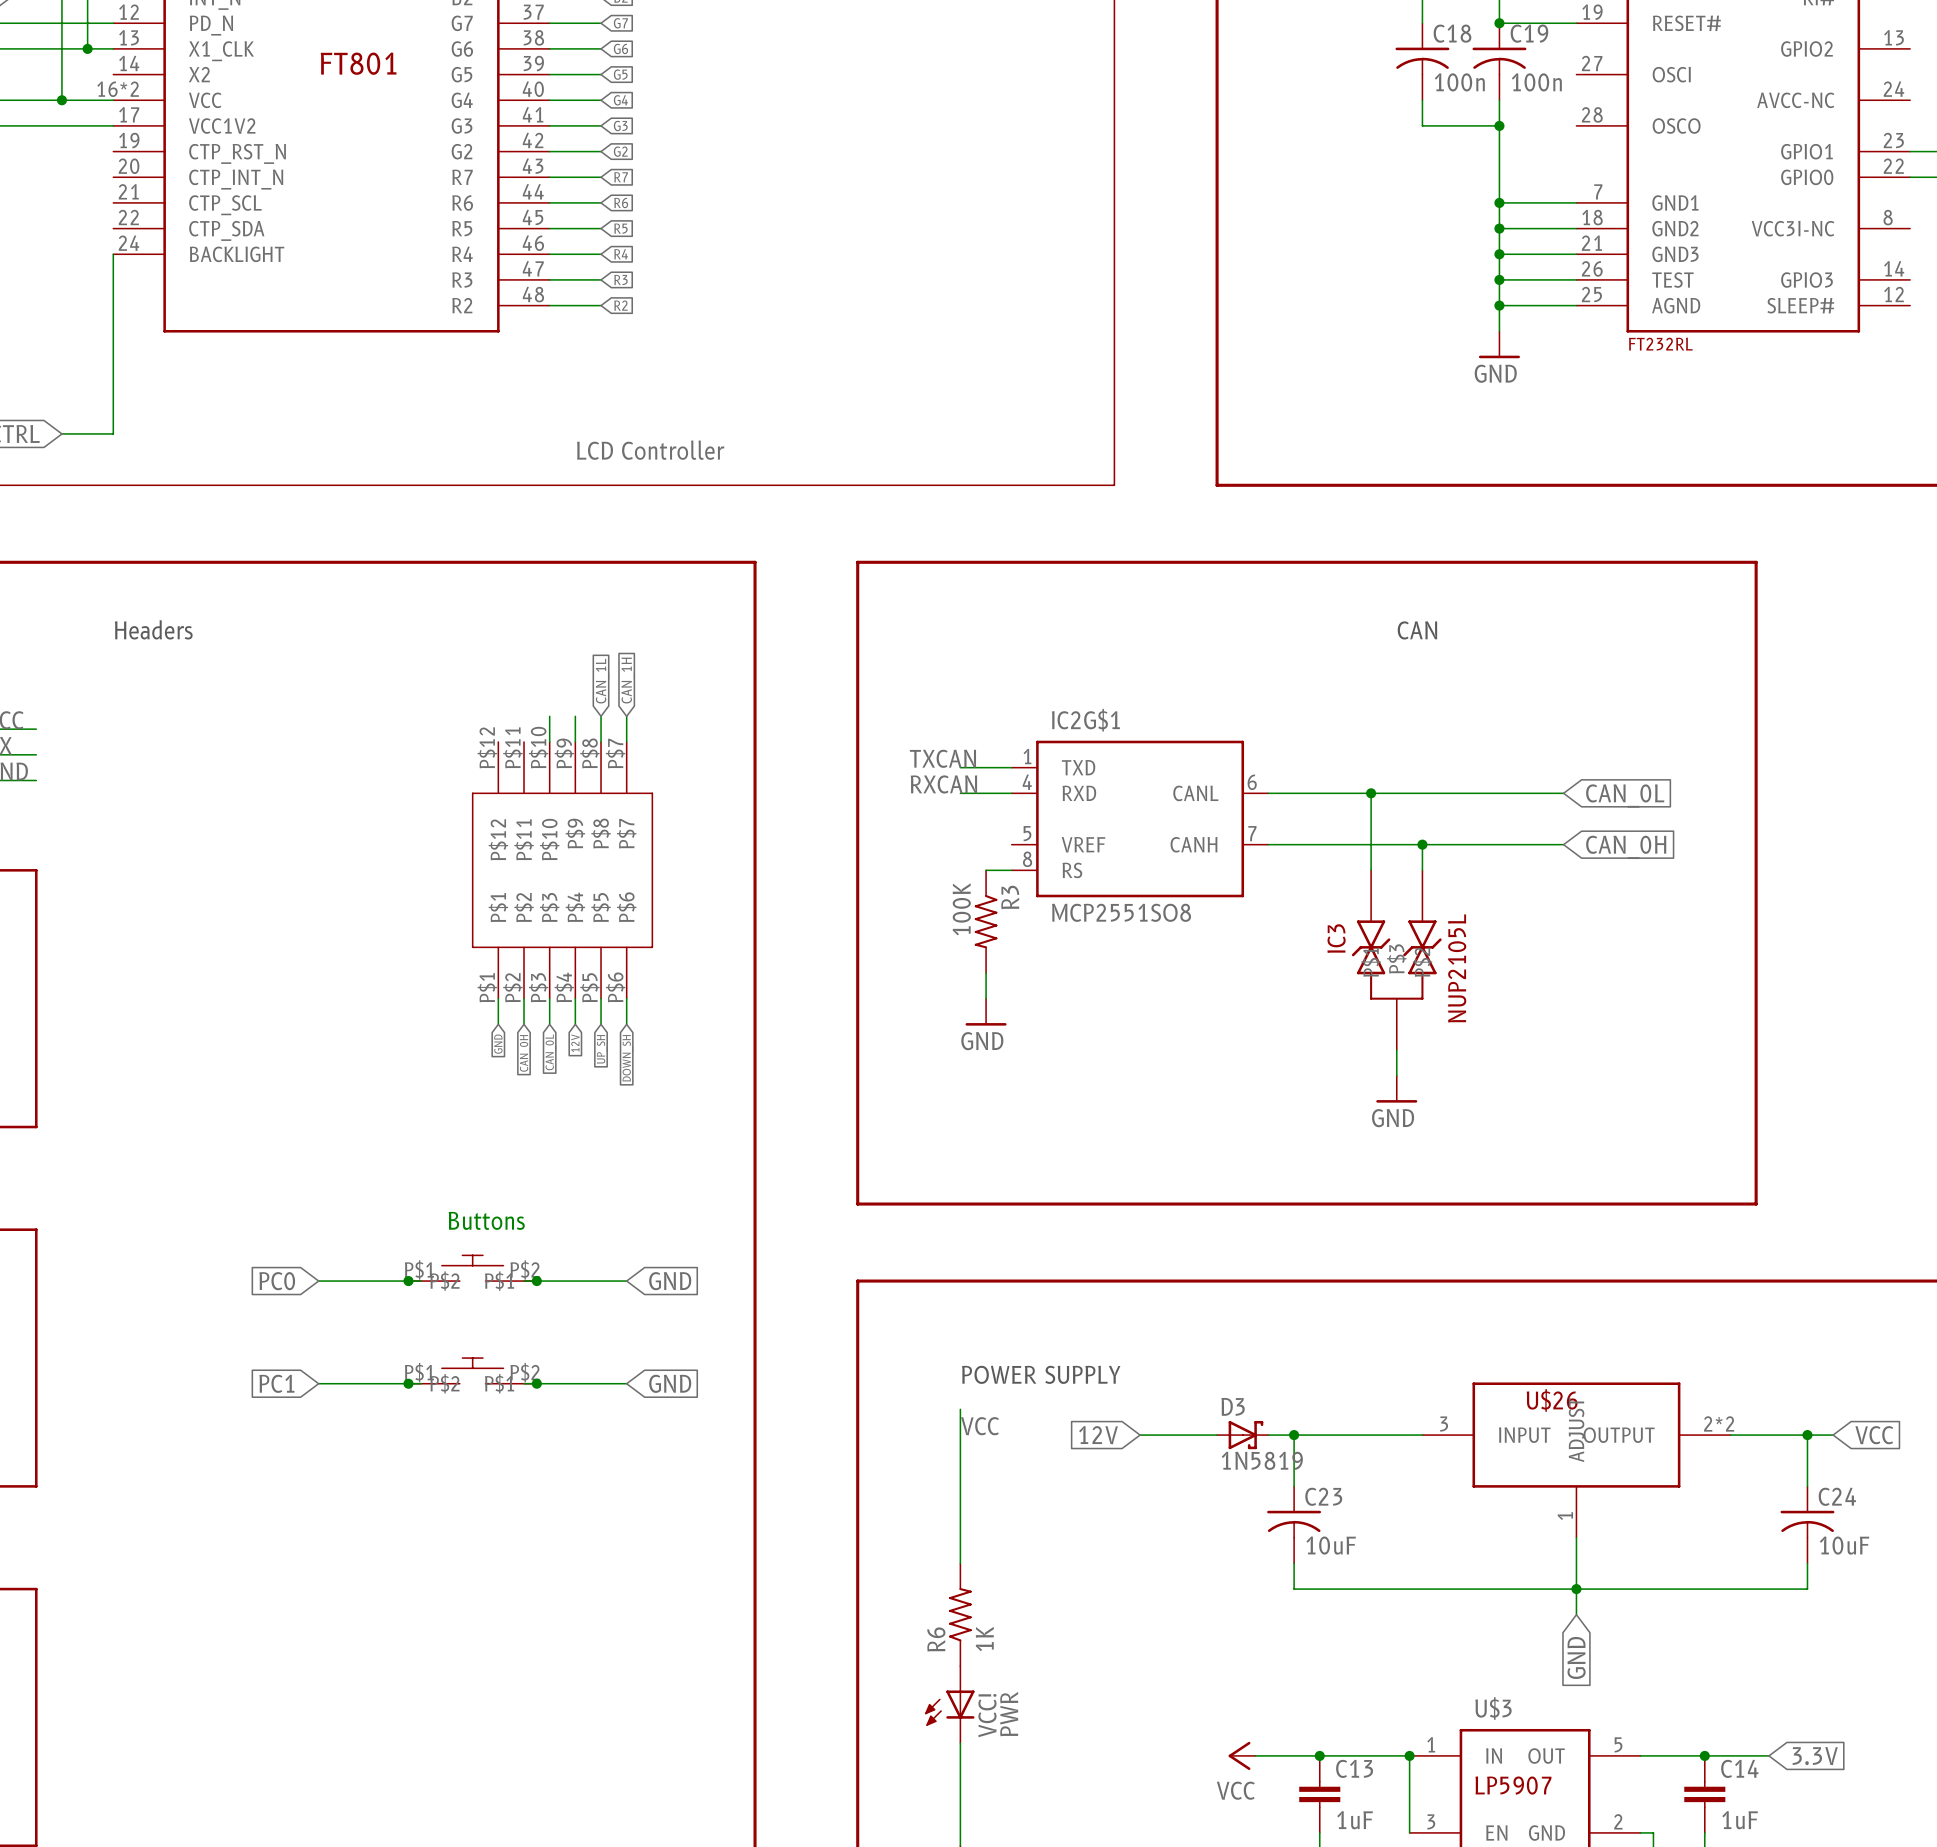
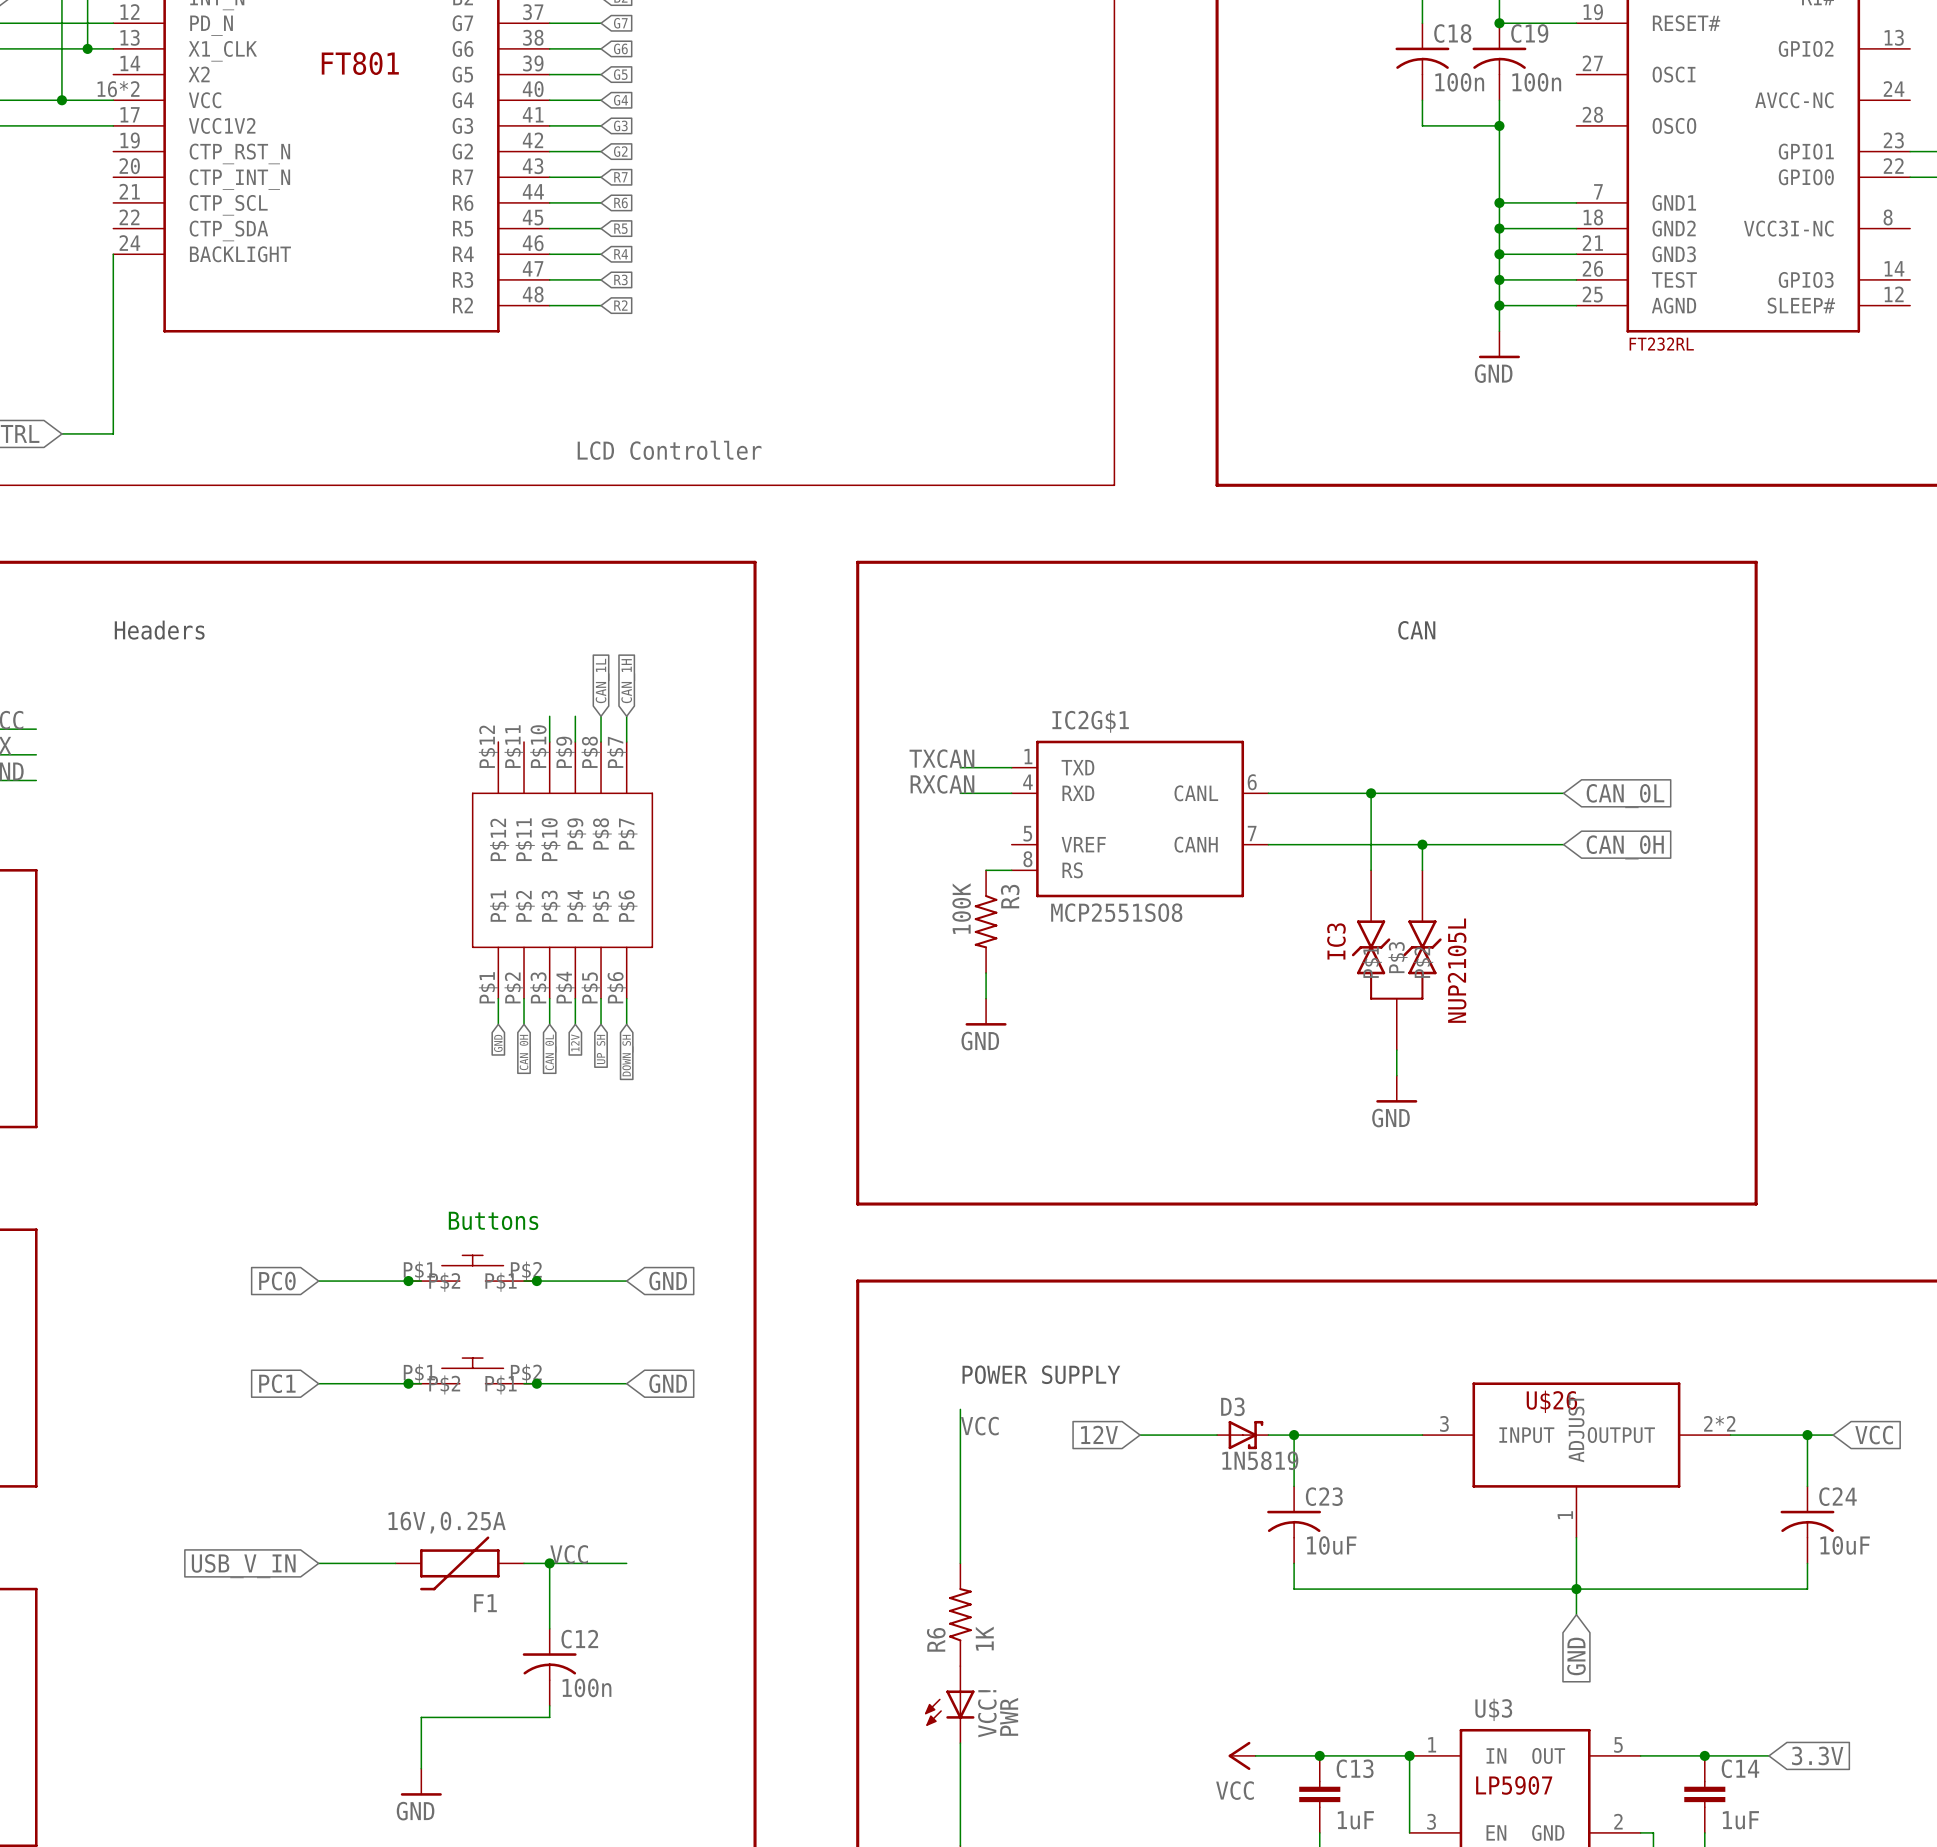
label: none -> VCC (569, 1554)
wire: none -> (318, 1563) (395, 1563)
F1: none -> 16V,0.25A (459, 1563)
wire: none -> (524, 1563) (626, 1563)
wire: none -> (549, 1563) (549, 1628)
junction: none -> (549, 1563)
global label: none -> USB_V_IN (243, 1566)
C12: none -> 100n (549, 1667)
wire: none -> (549, 1705) (549, 1717) (421, 1717) (421, 1768)
power symbol: none -> GND (421, 1782)

